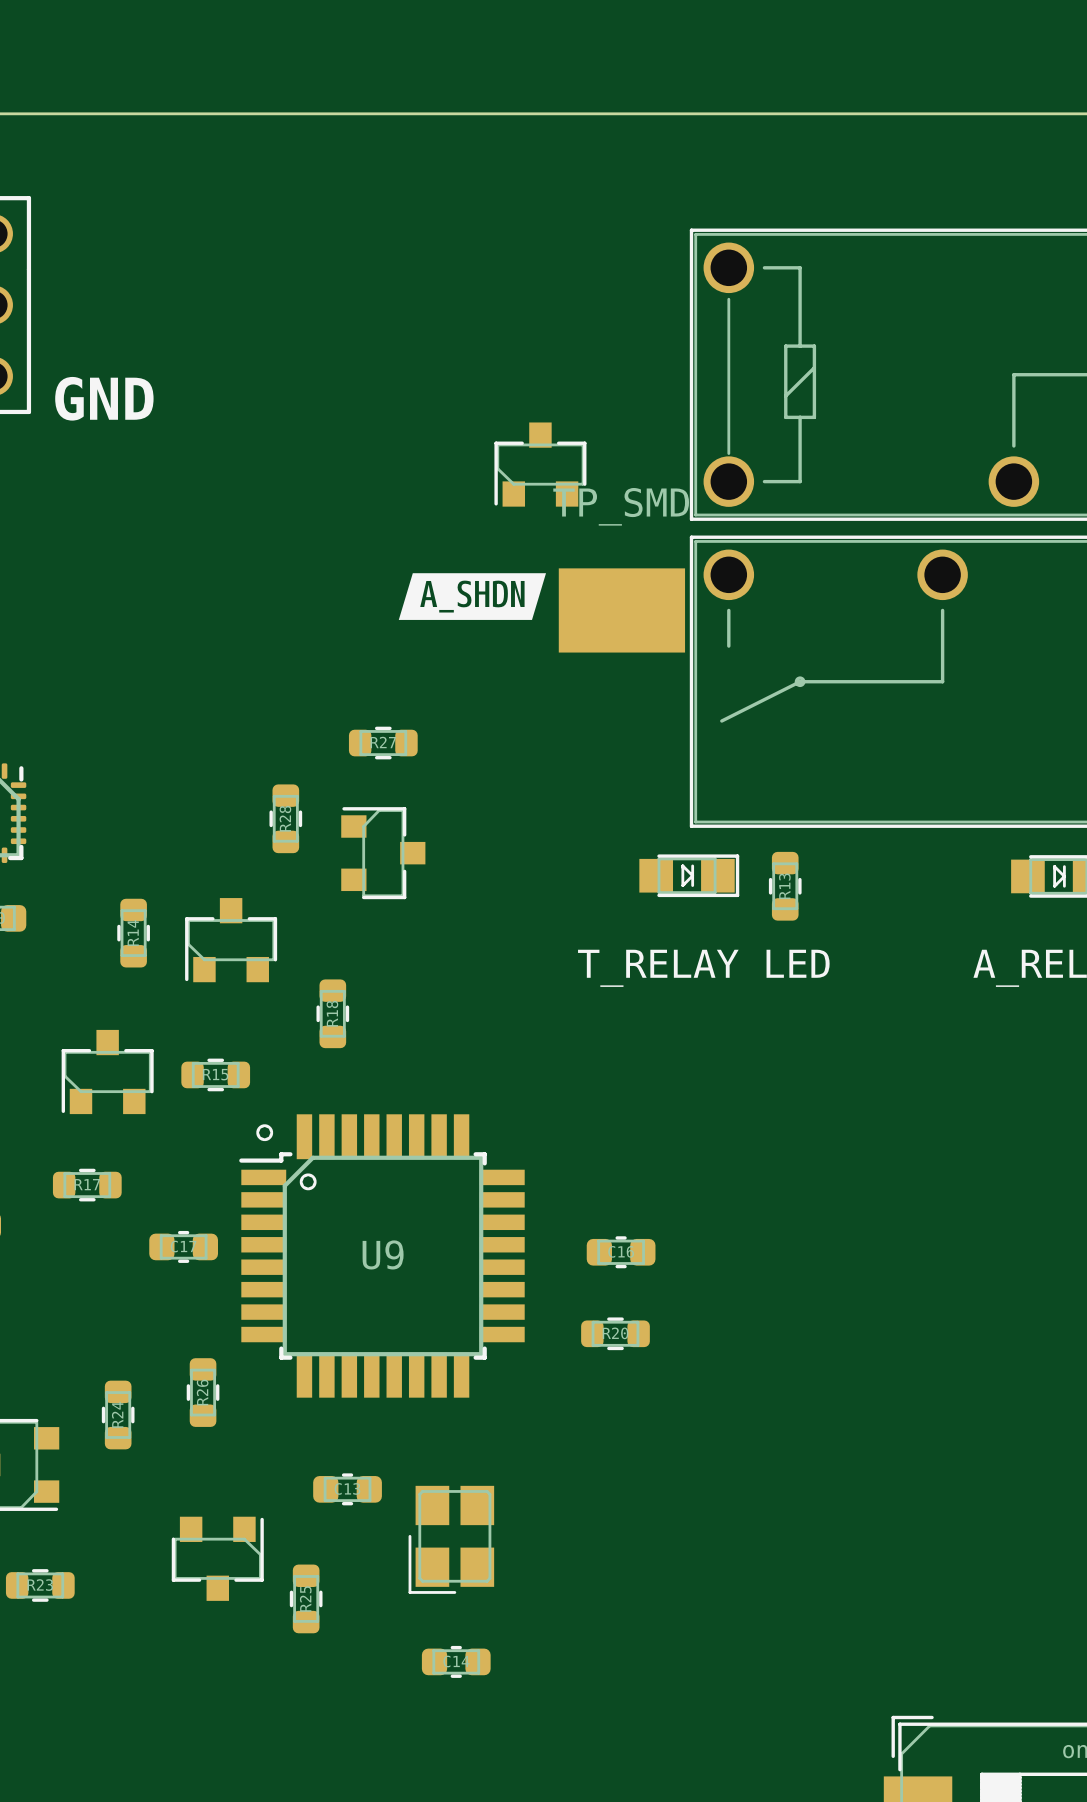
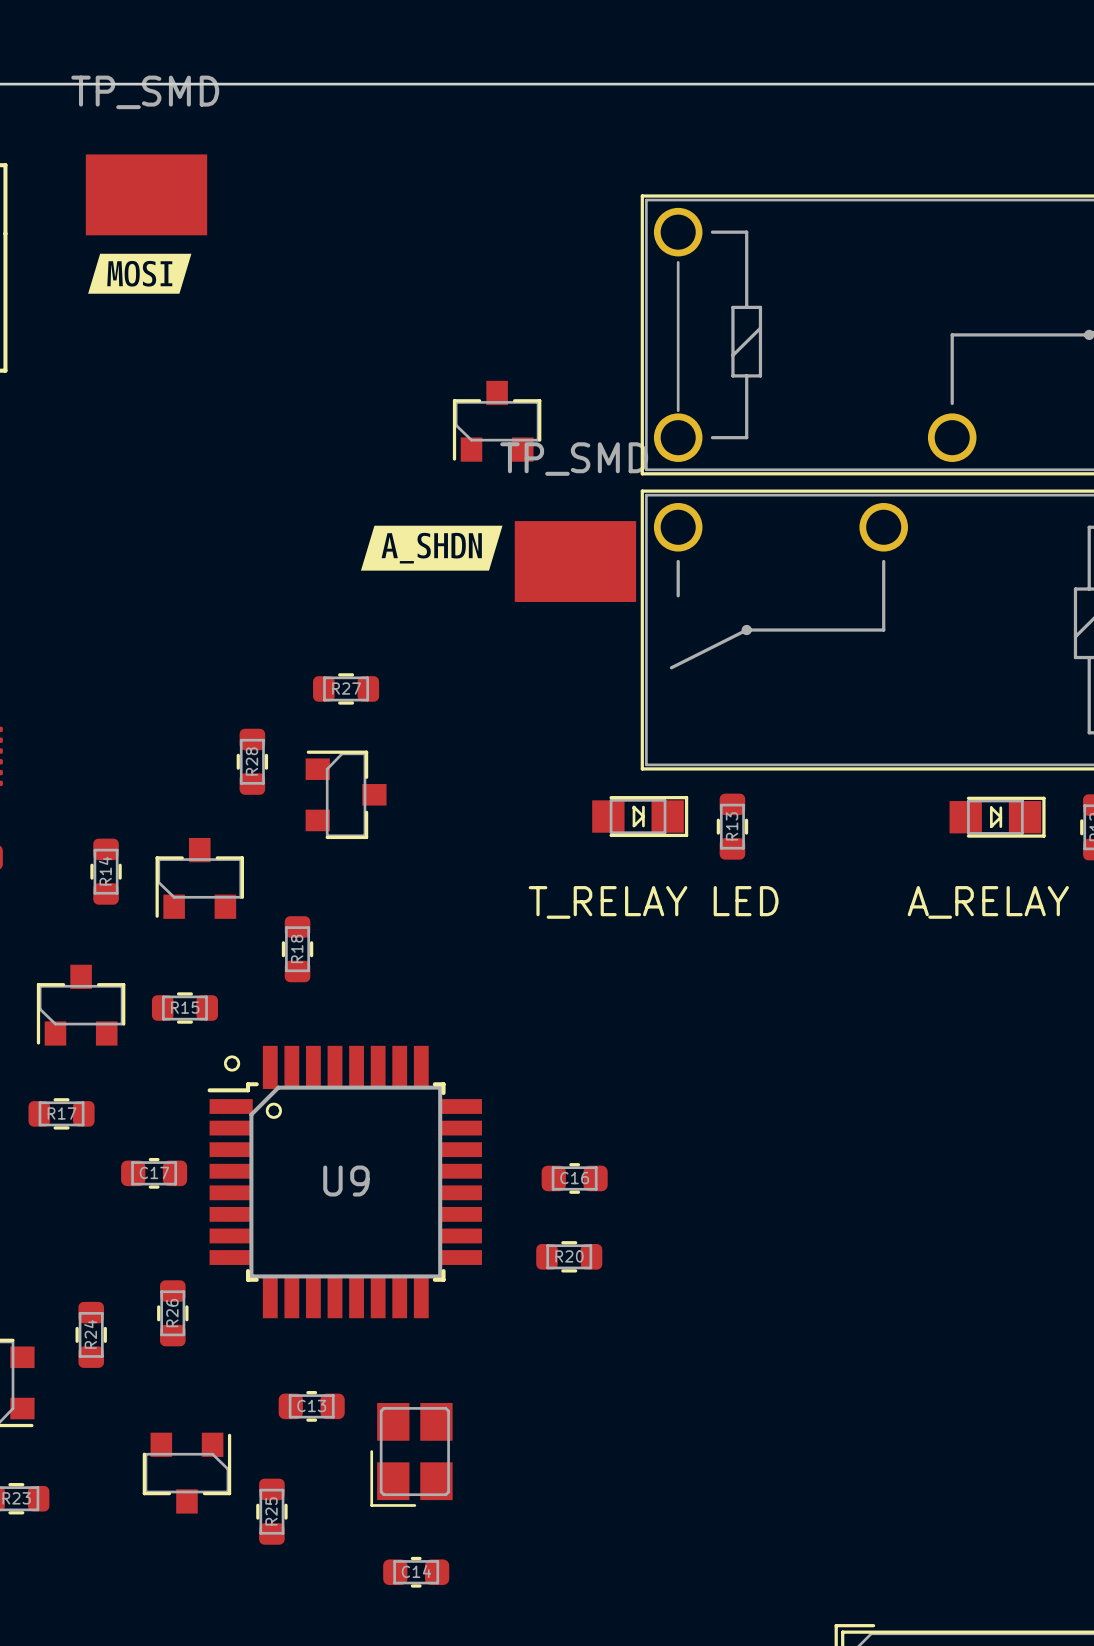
part: none -> TP_SMD (146, 194)
drawing: none -> [88, 253, 192, 294]
text: GND (104, 398) -> none

